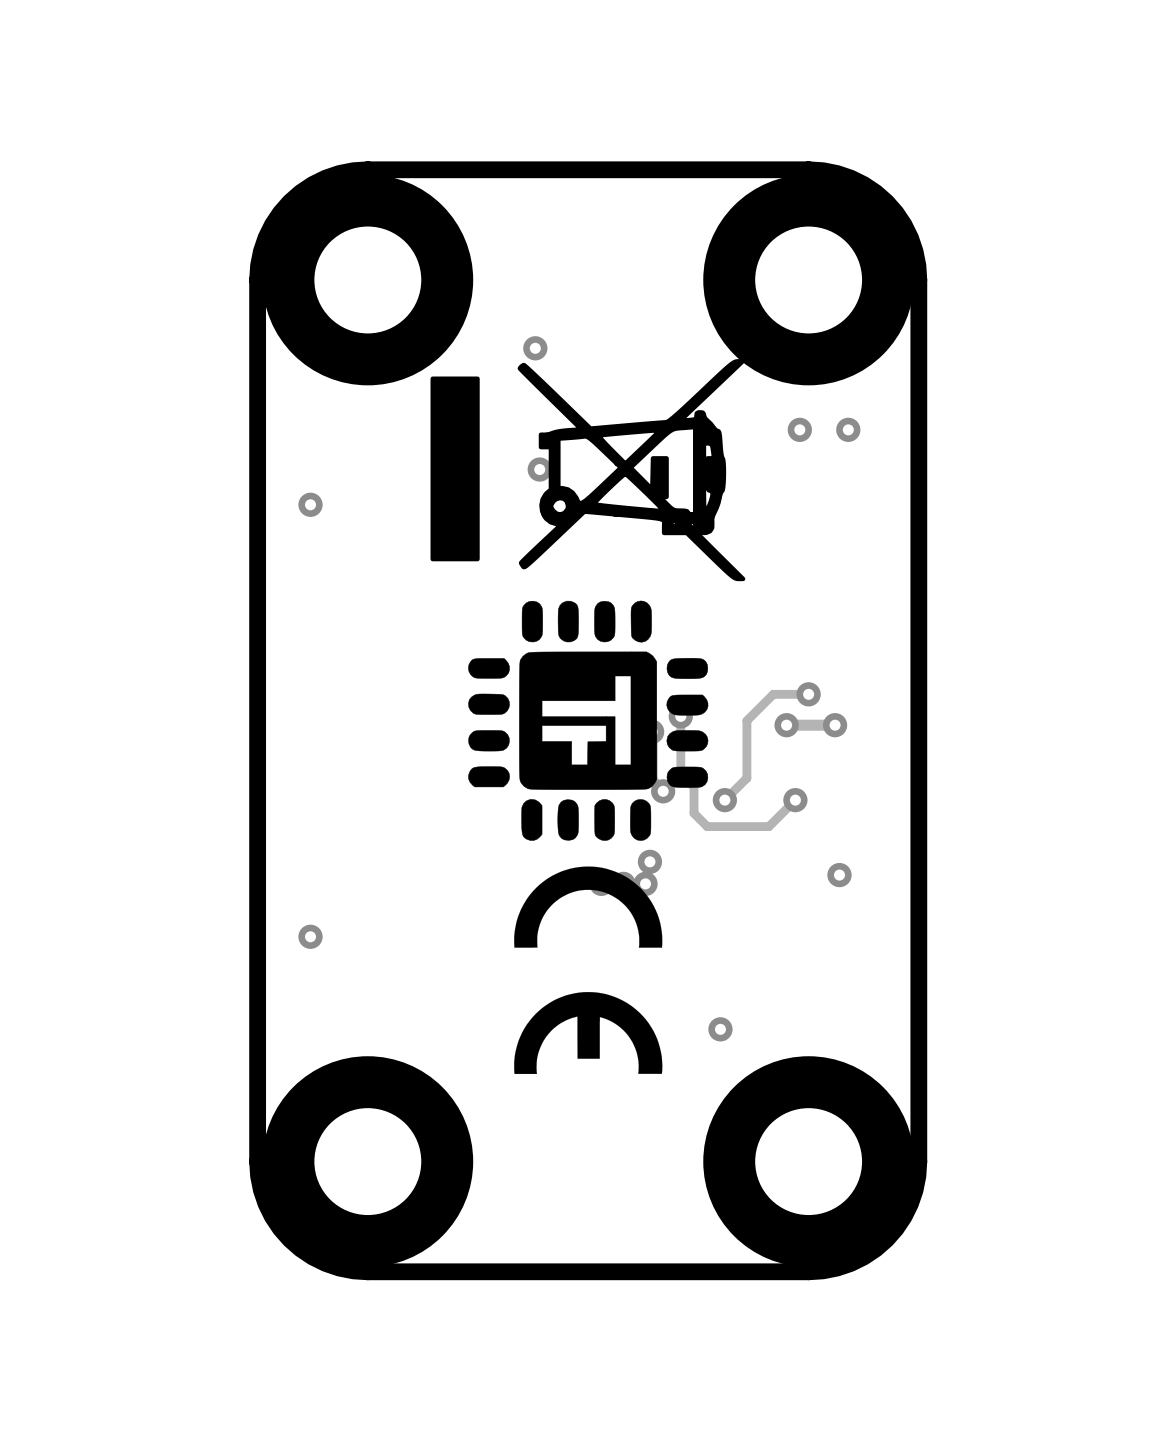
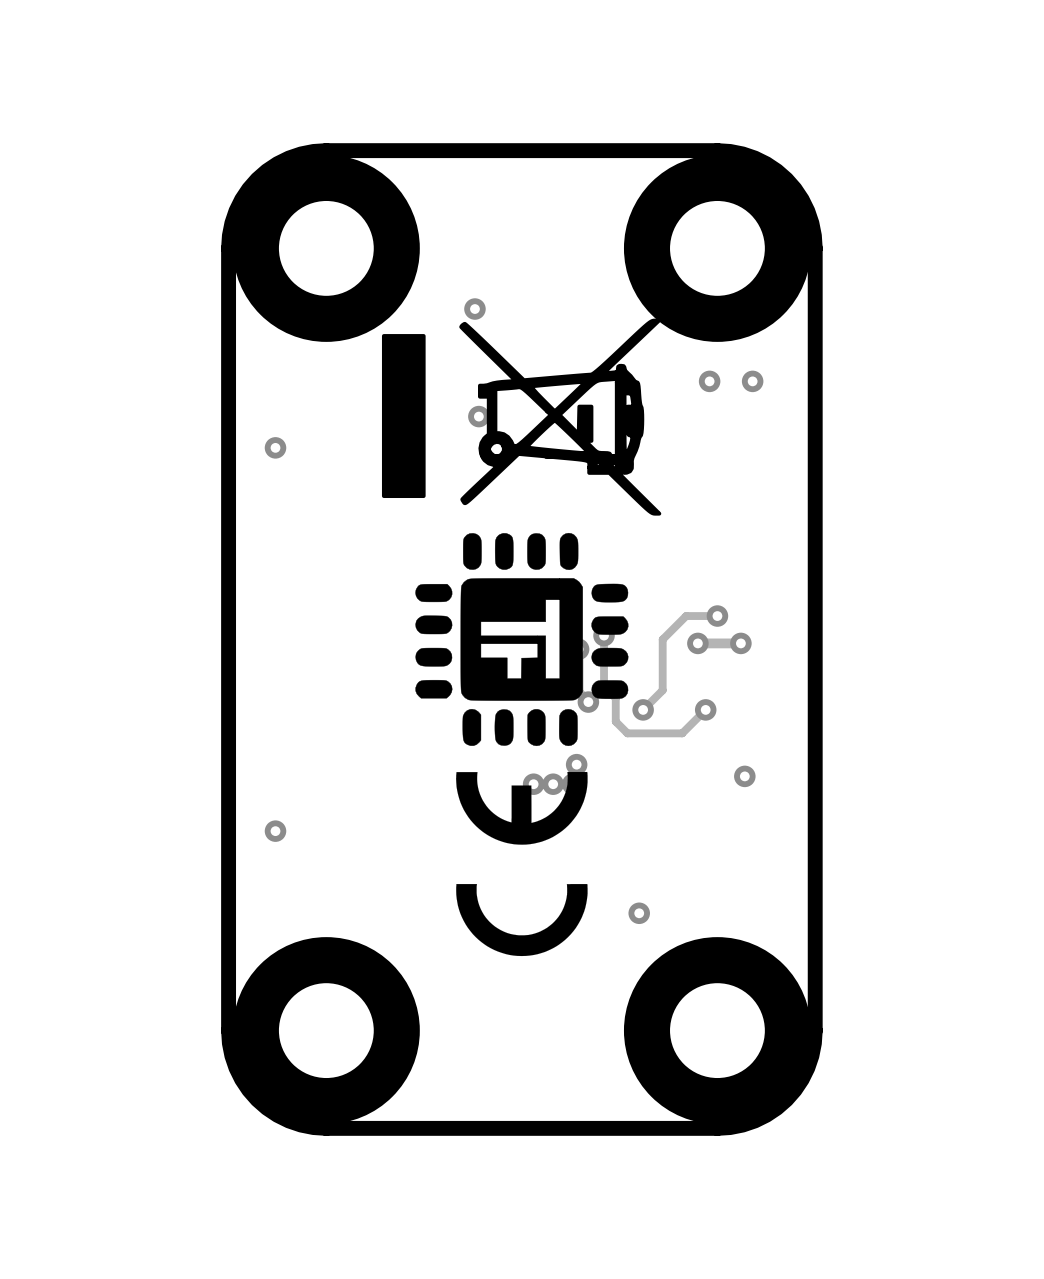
drawing shape: [514, 866, 663, 1074] -> [456, 771, 588, 957]

